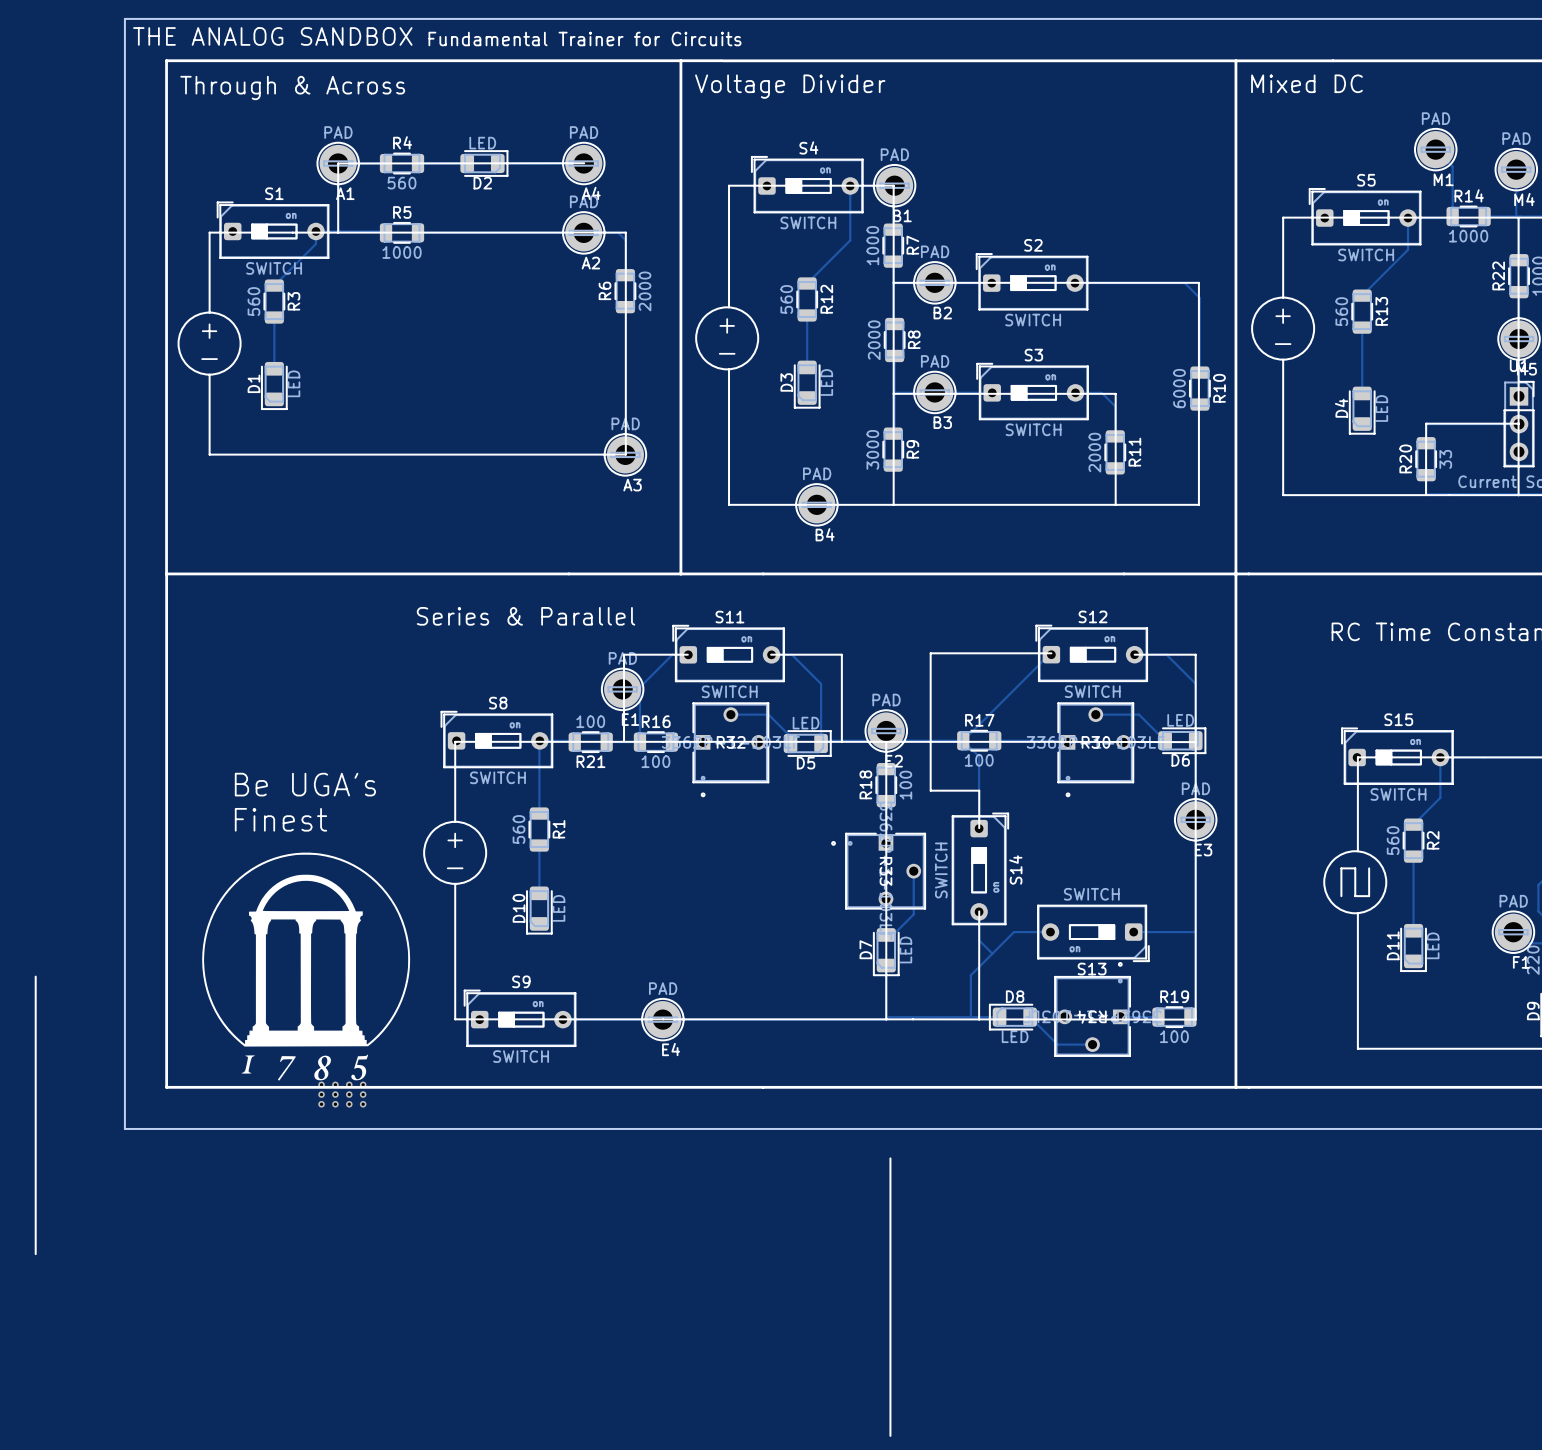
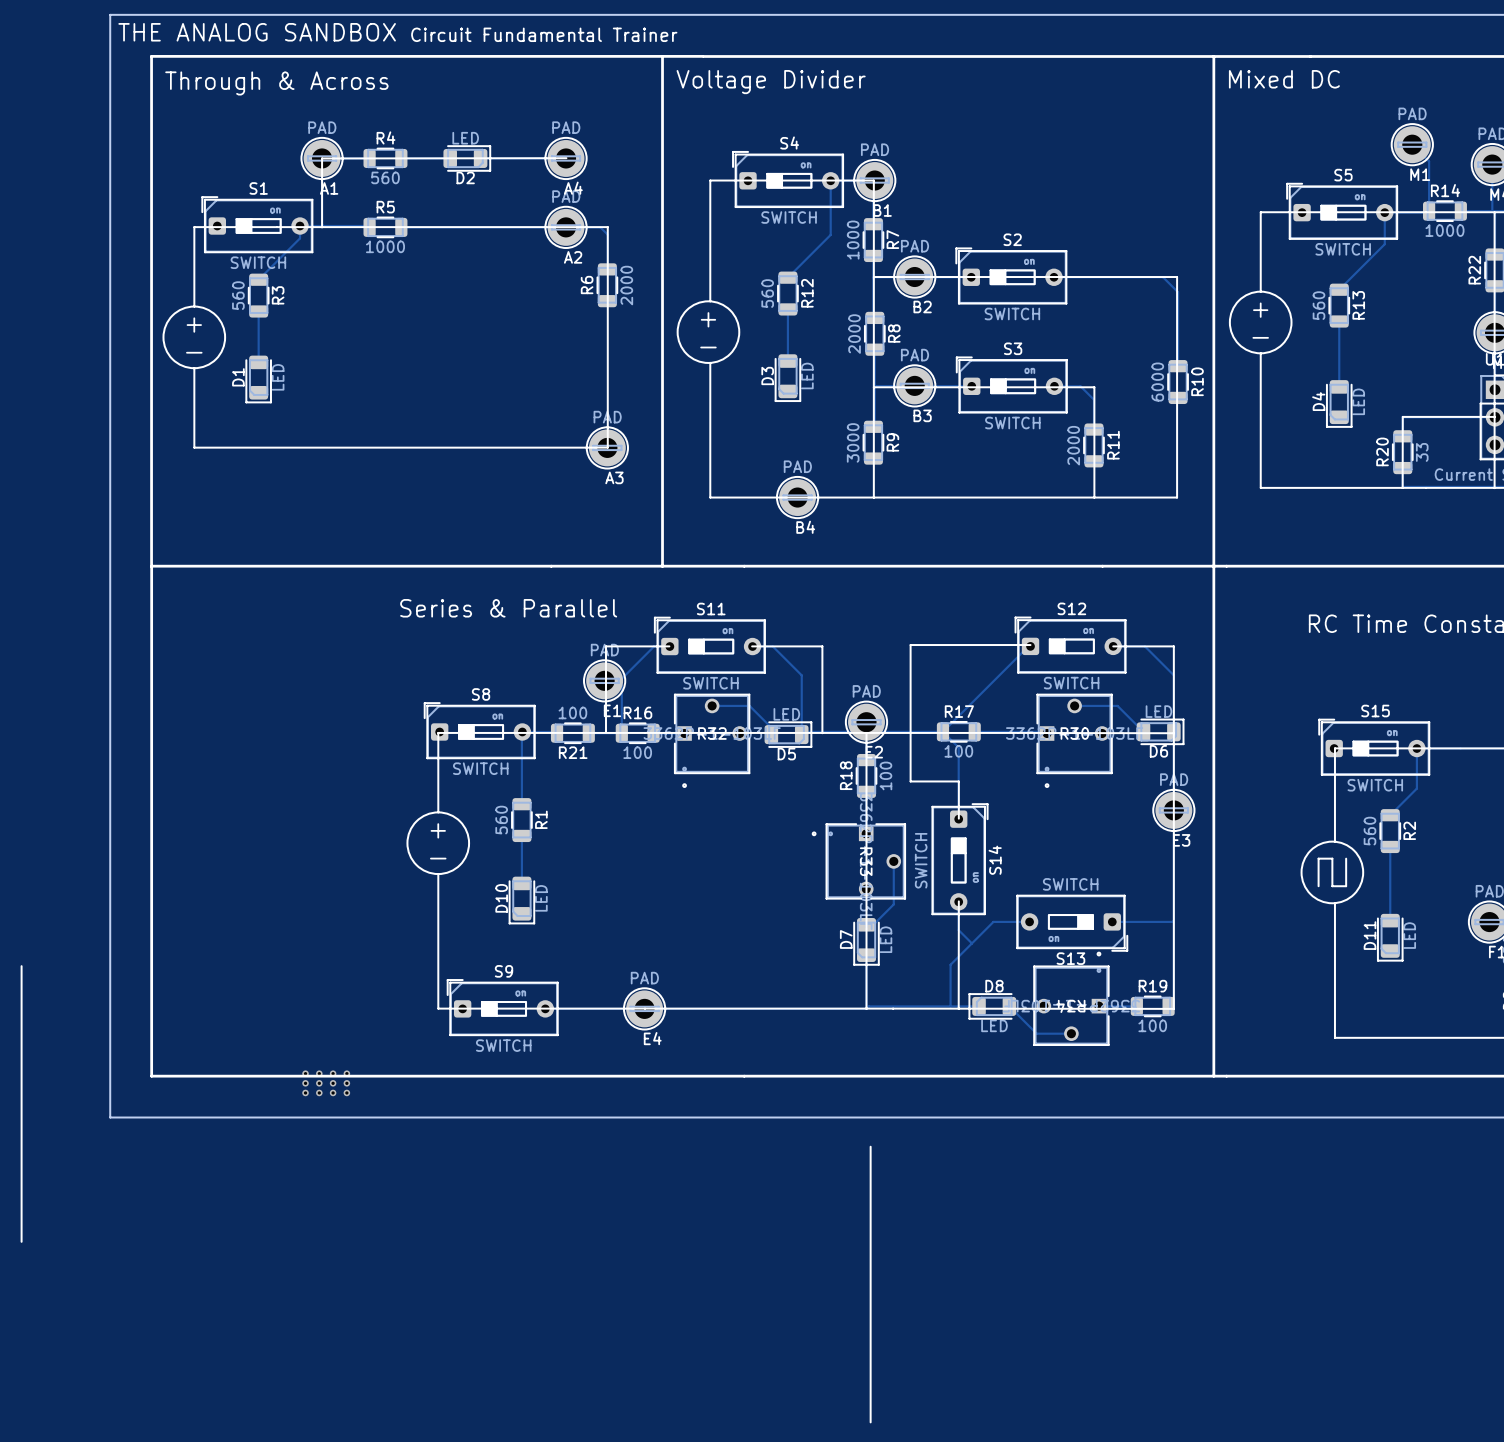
text: Fundamental Trainer for Circuits (584, 39) -> Circuit Fundamental Trainer (544, 34)
text: Be UGA's (305, 784) -> none
text: Finest (280, 819) -> none
drawing: [202, 852, 411, 1081] -> none

